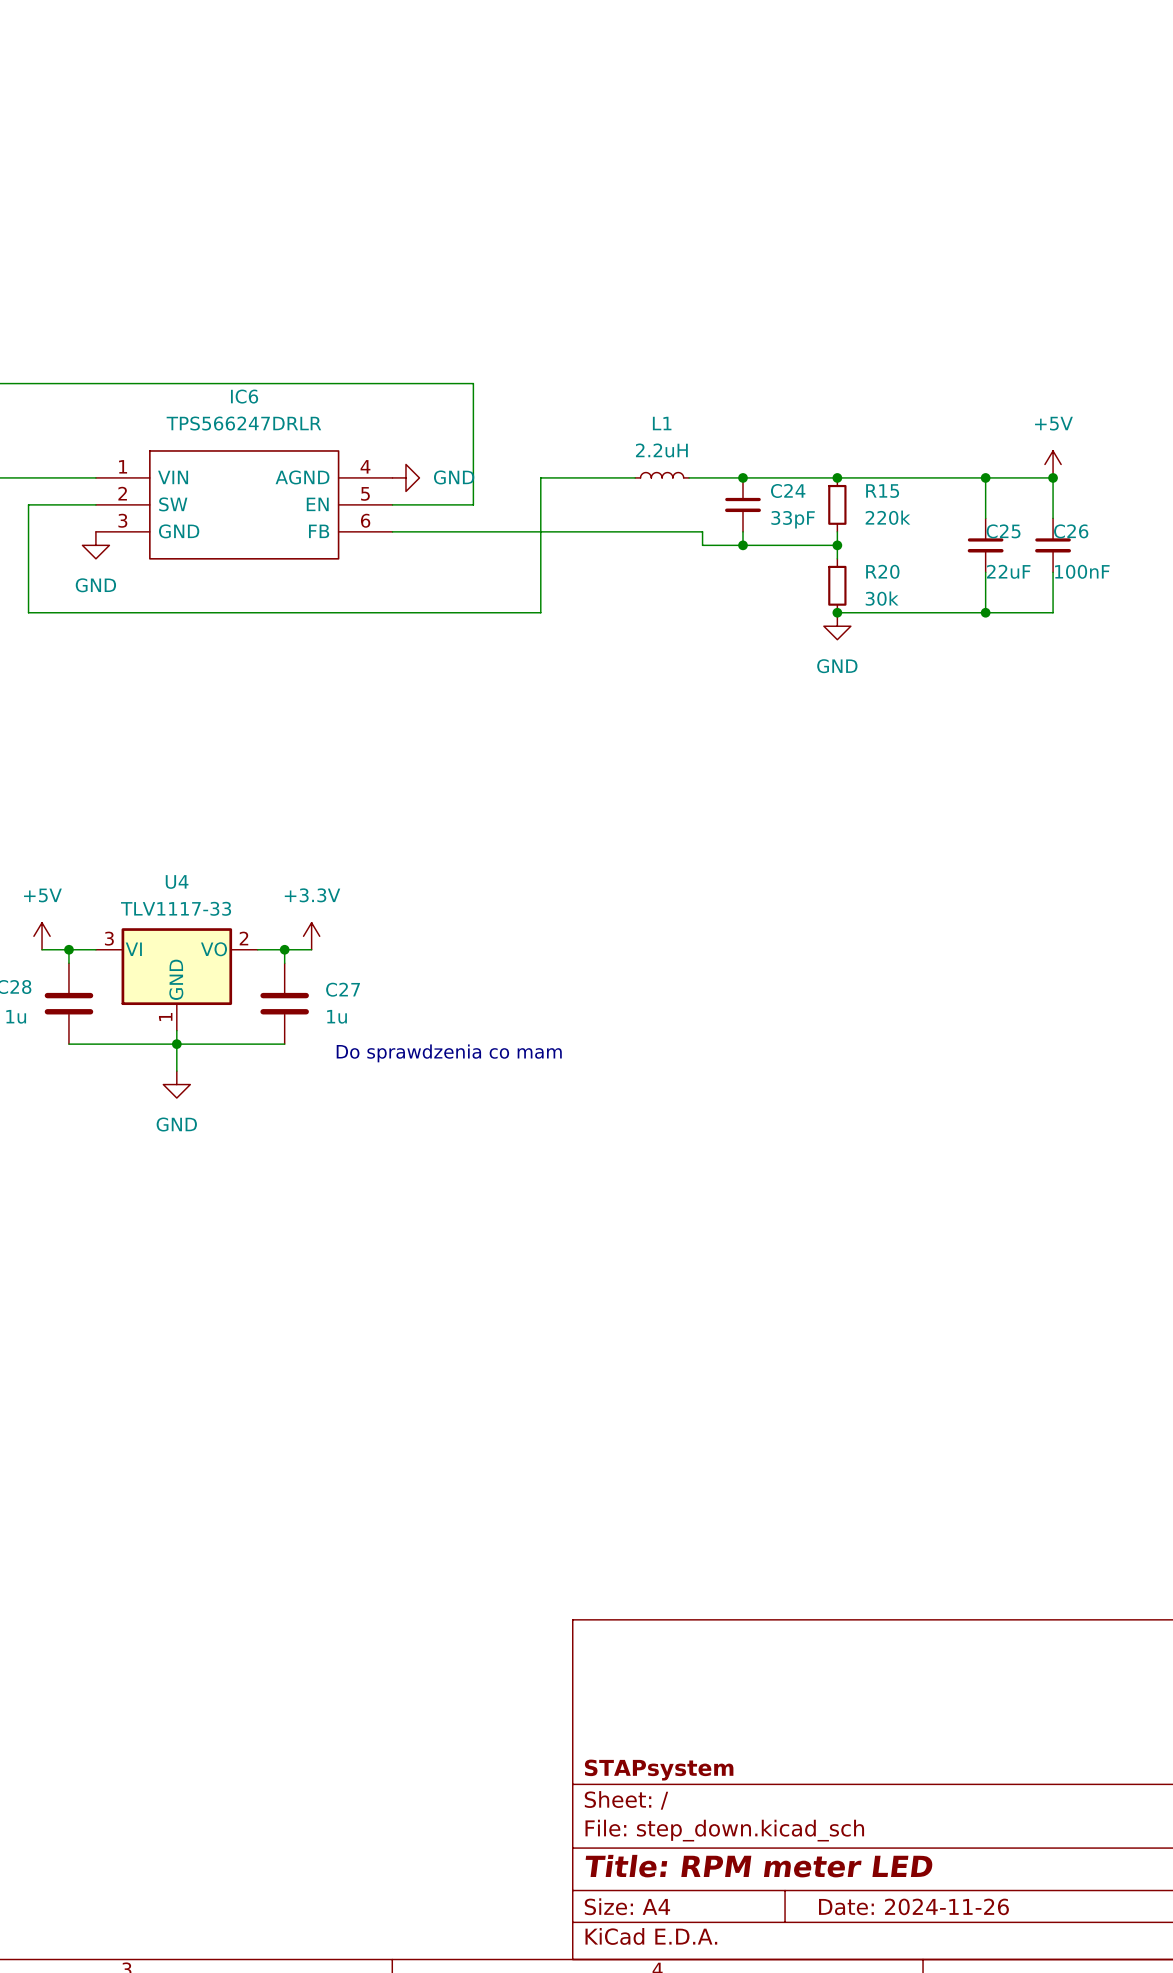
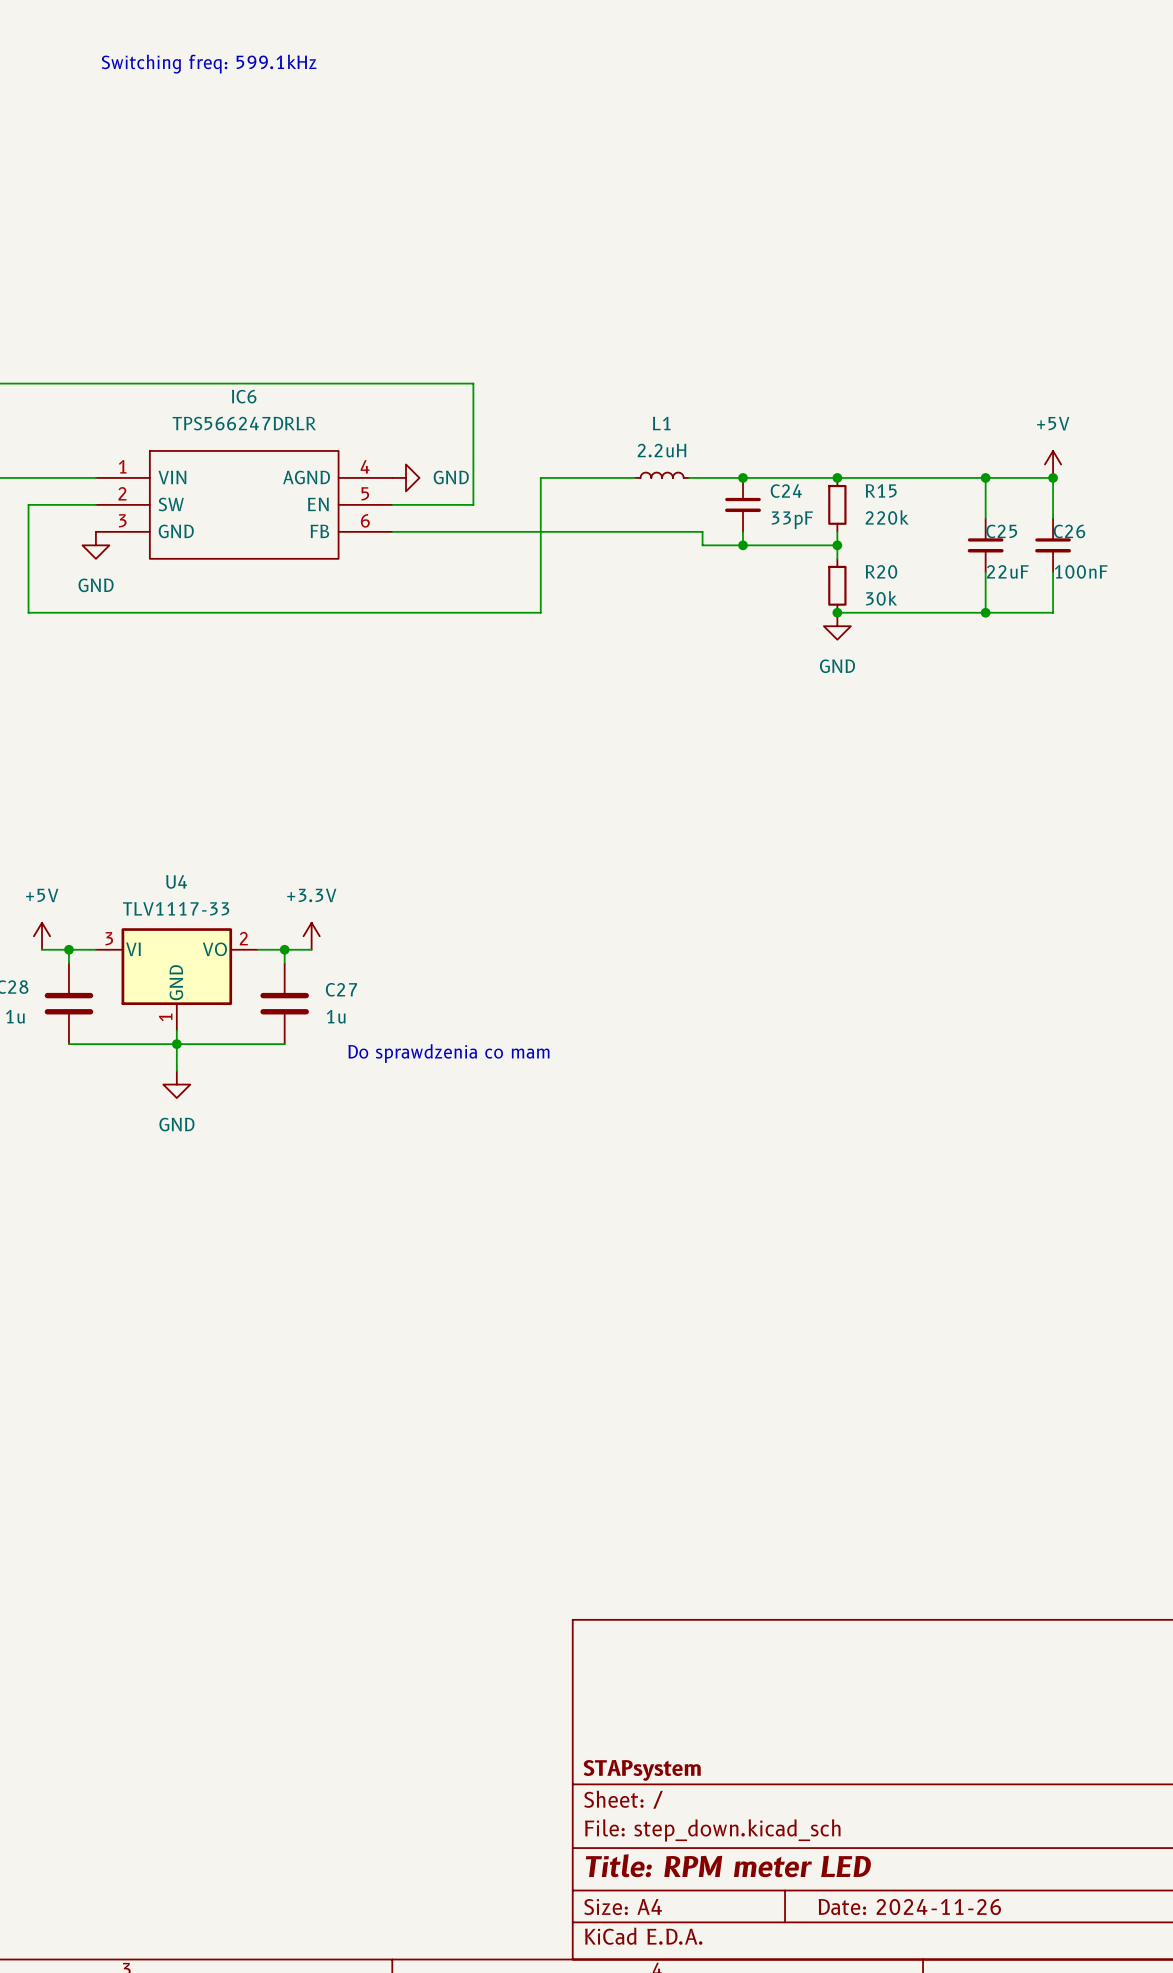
text: none -> Switching freq: 599.1kHz (209, 64)

